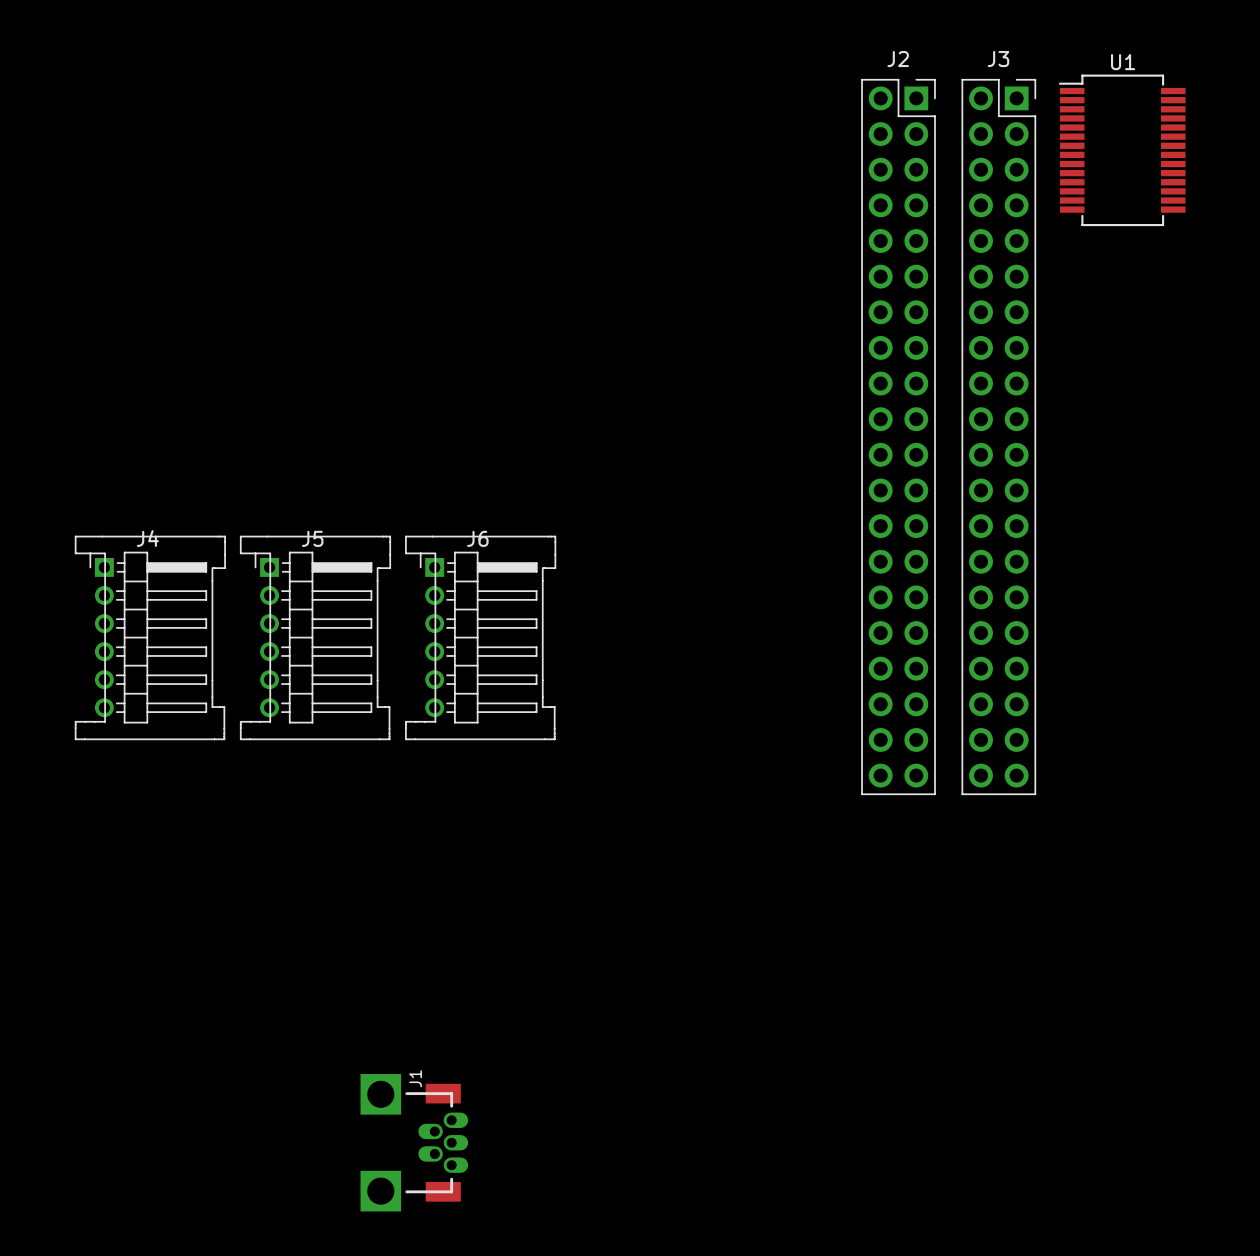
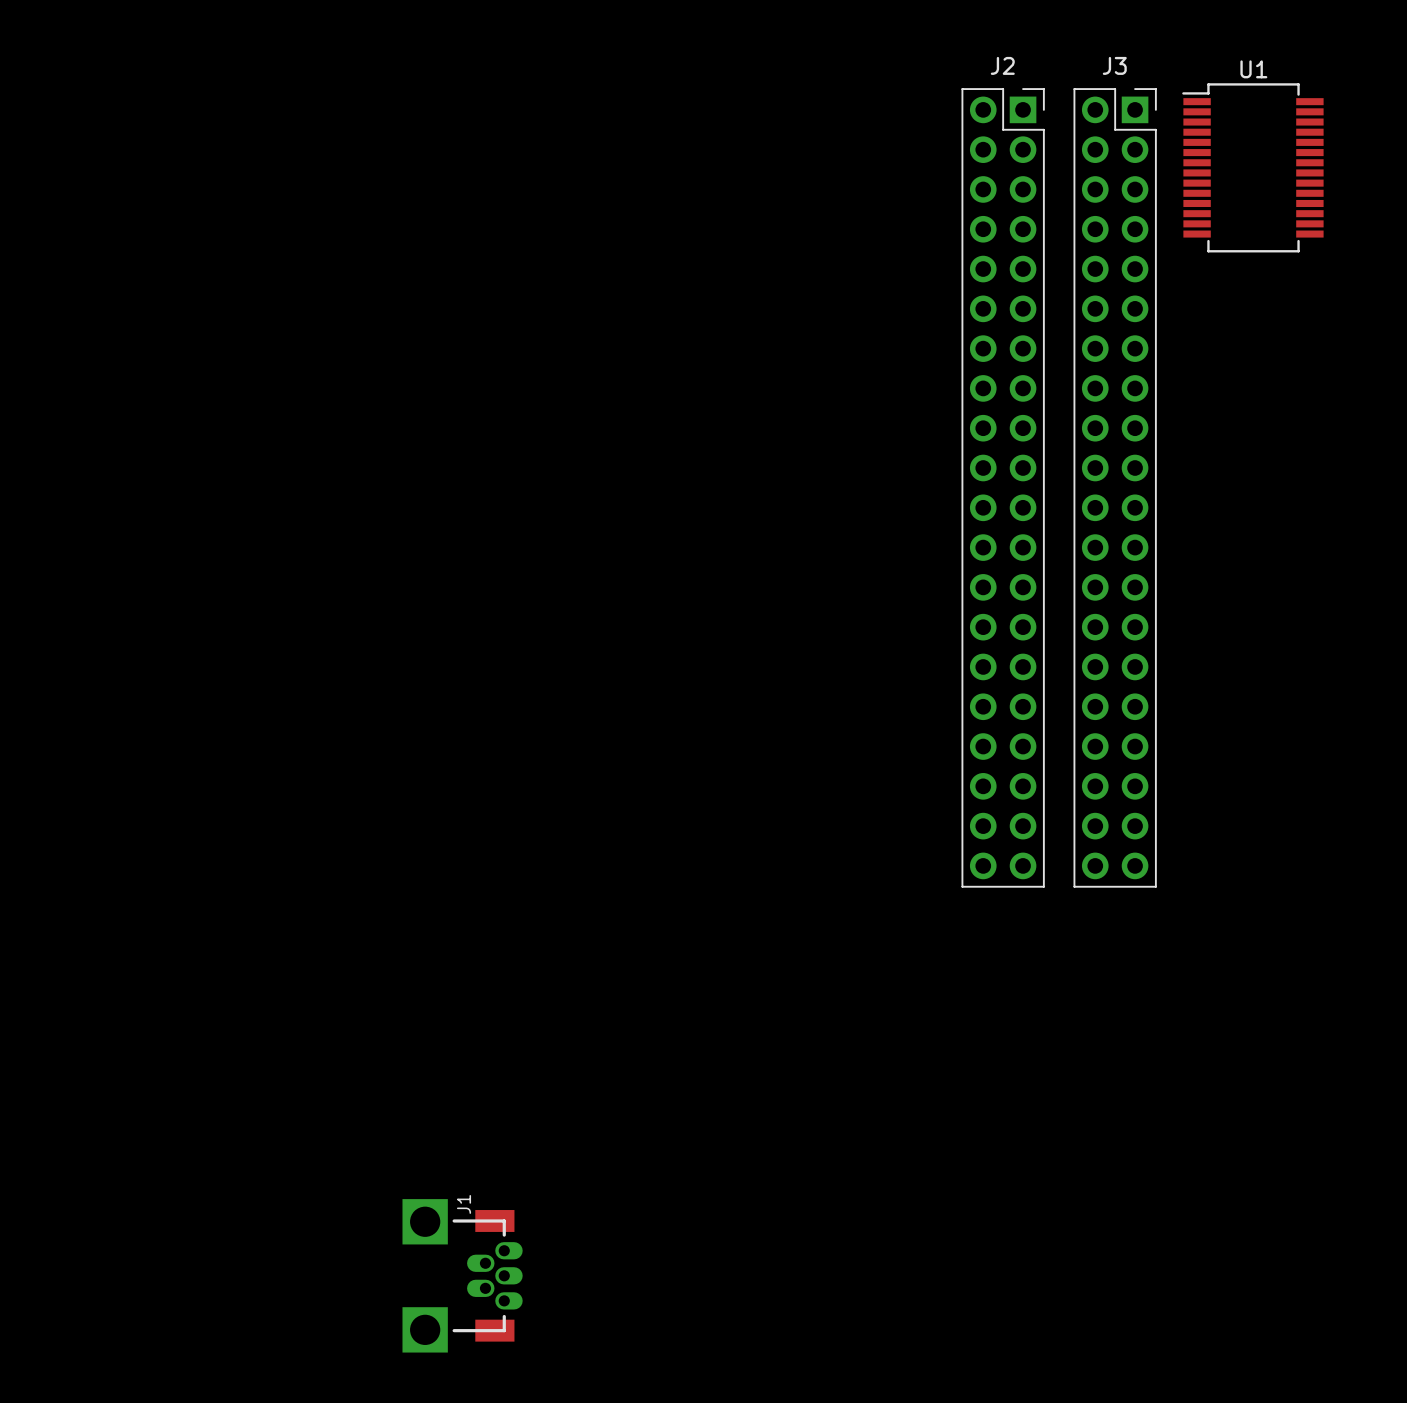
J4: (150, 637) -> none
J5: (315, 637) -> none
J6: (480, 637) -> none

